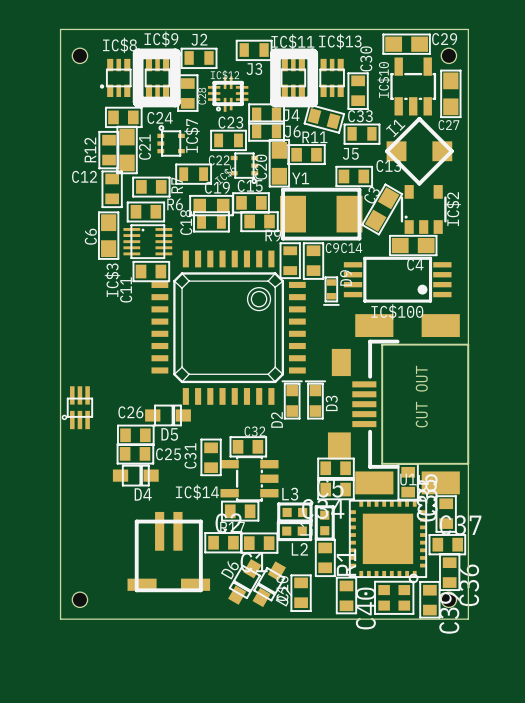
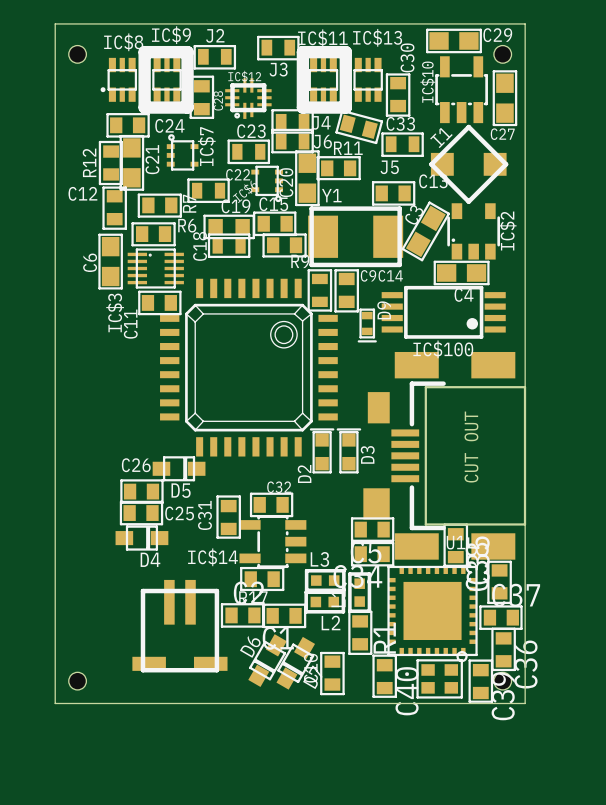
part: (77, 407) -> none

